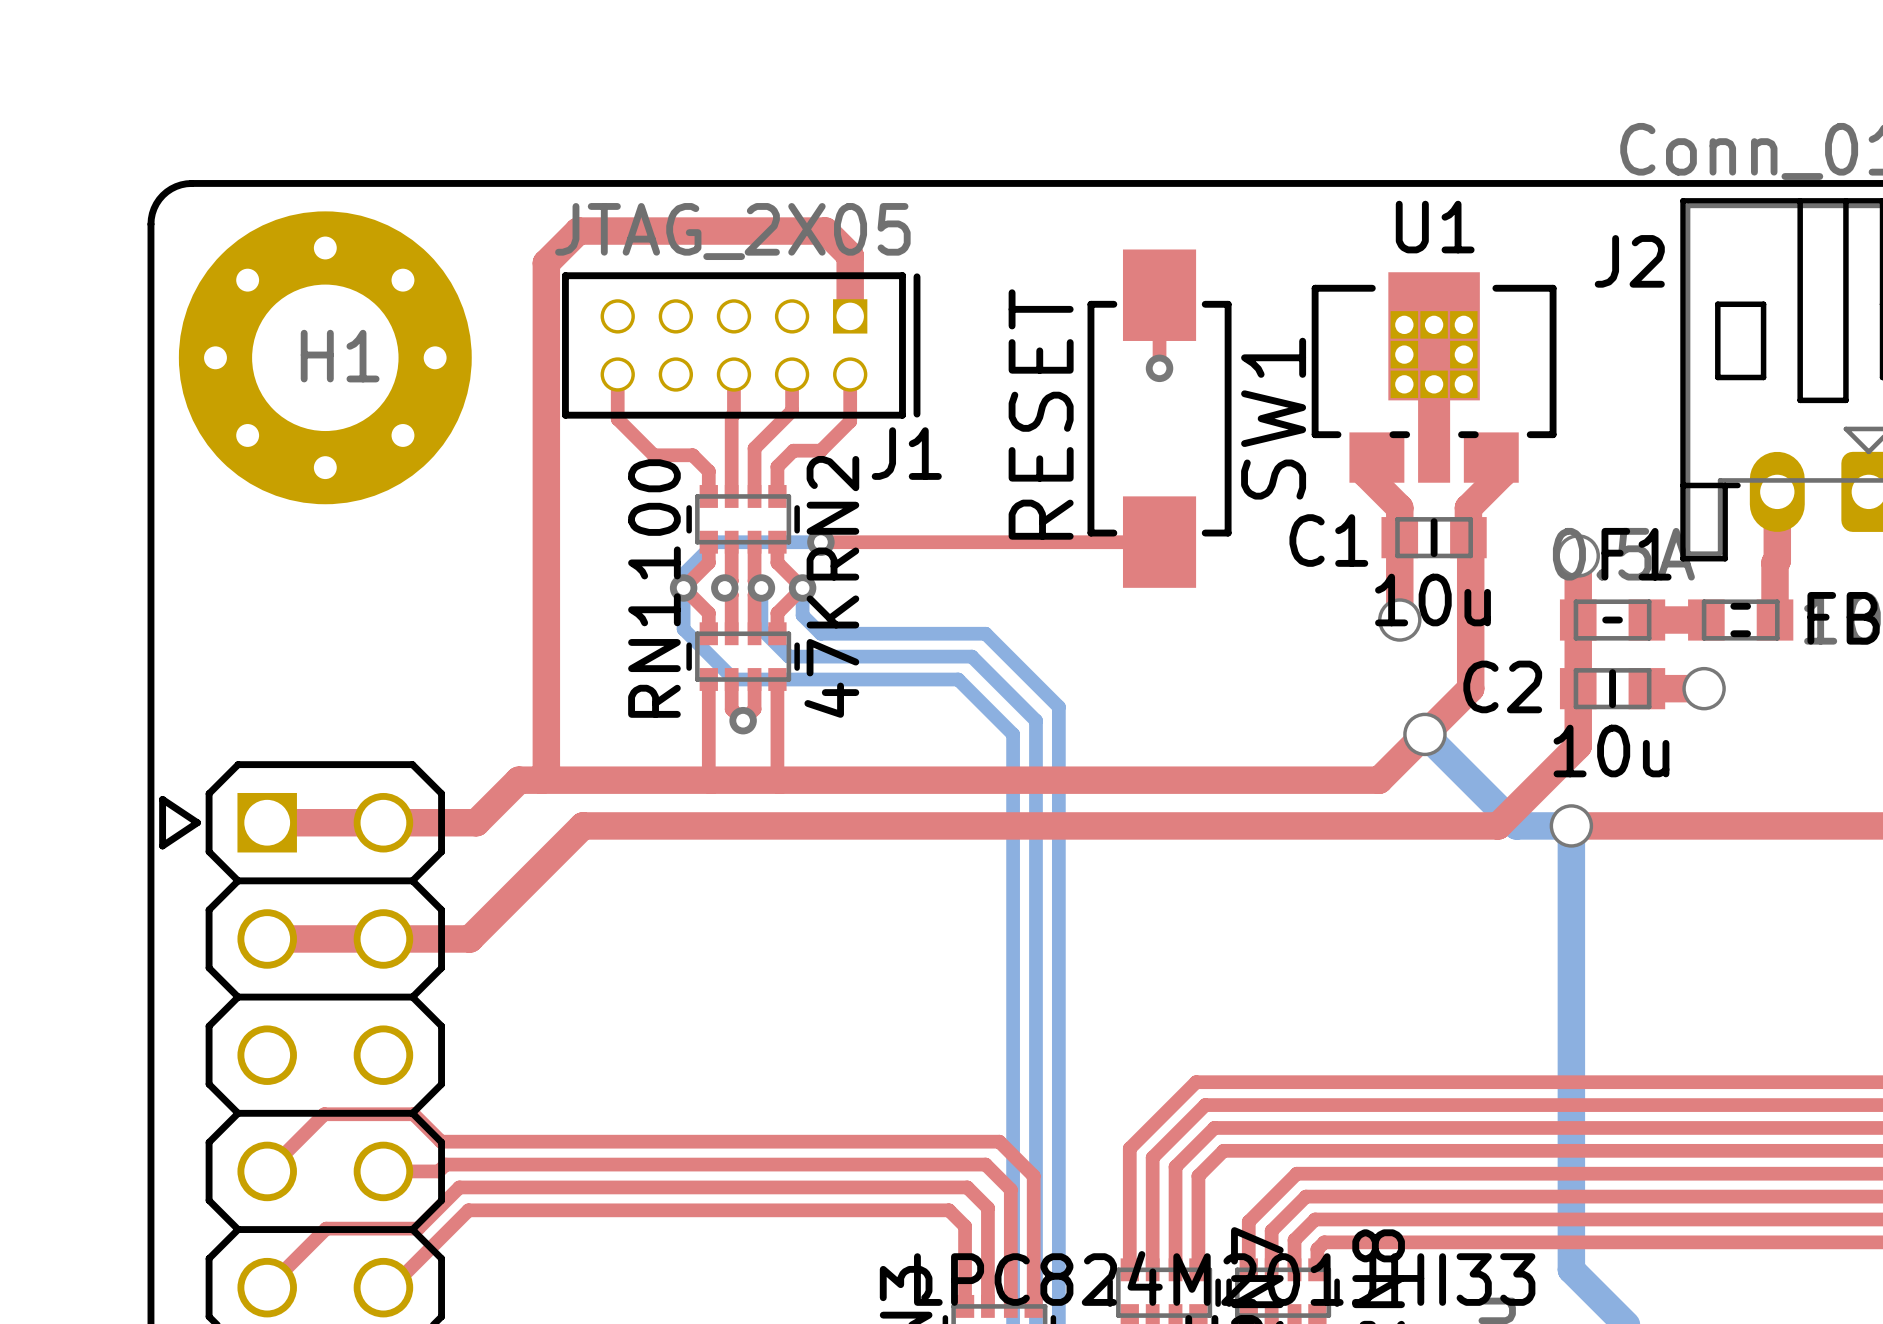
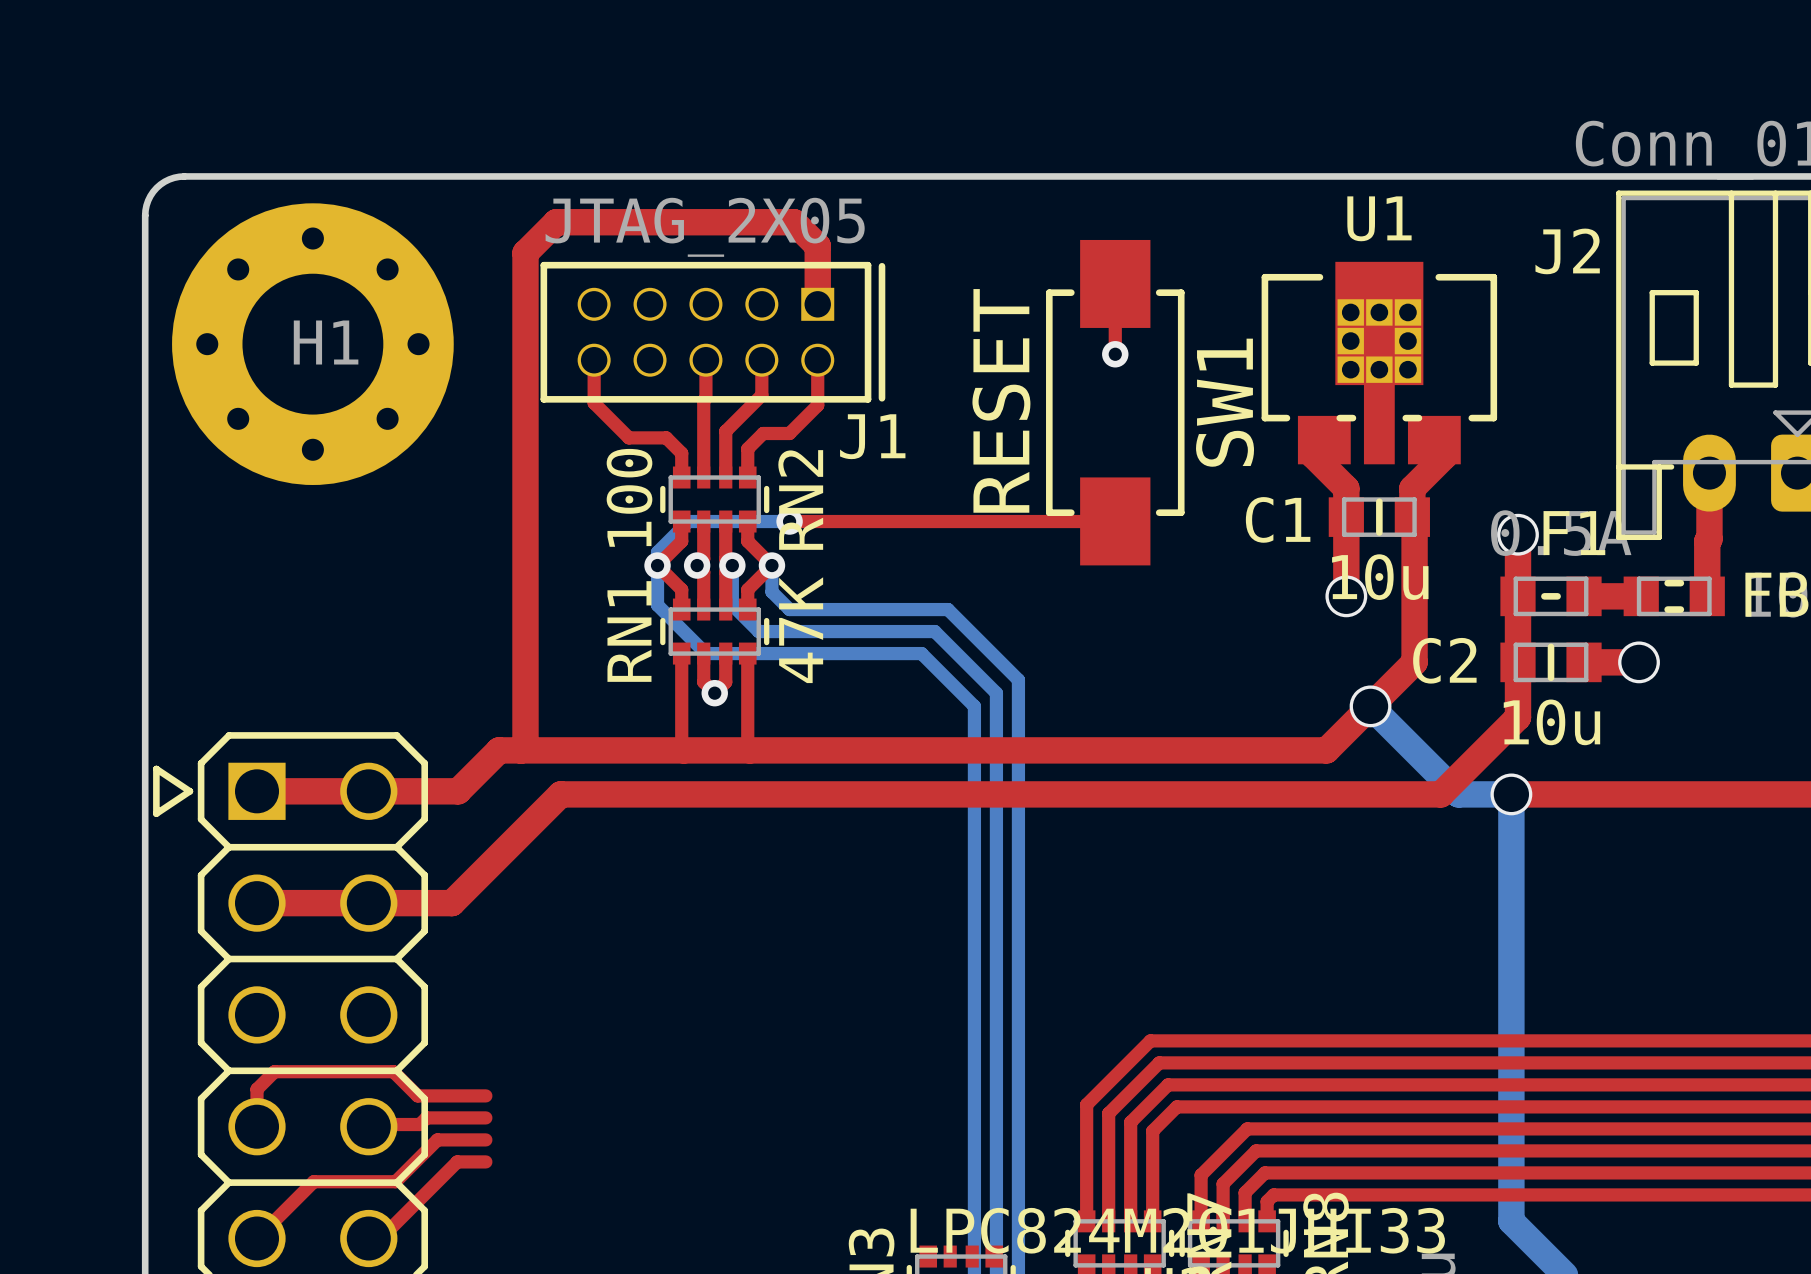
top track: (324, 1114) (267, 1171) -> (312, 1071) (274, 1071) (257, 1089) (257, 1126)
top track: (409, 1114) (413, 1114) (441, 1141) (999, 1141) (1033, 1176) (1033, 1306) -> (393, 1071) (417, 1095) (485, 1095)
top track: (383, 1171) (438, 1171) (445, 1164) (985, 1164) (1010, 1189) (1010, 1306) -> (368, 1126) (371, 1124) (419, 1124) (426, 1117) (485, 1117)
top track: (411, 1228) (418, 1228) (459, 1187) (967, 1187) (987, 1208) (987, 1306) -> (395, 1181) (437, 1139) (485, 1139)
top track: (391, 1287) (468, 1210) (949, 1210) (965, 1226) (965, 1306) -> (376, 1238) (380, 1238) (457, 1161) (485, 1161)

